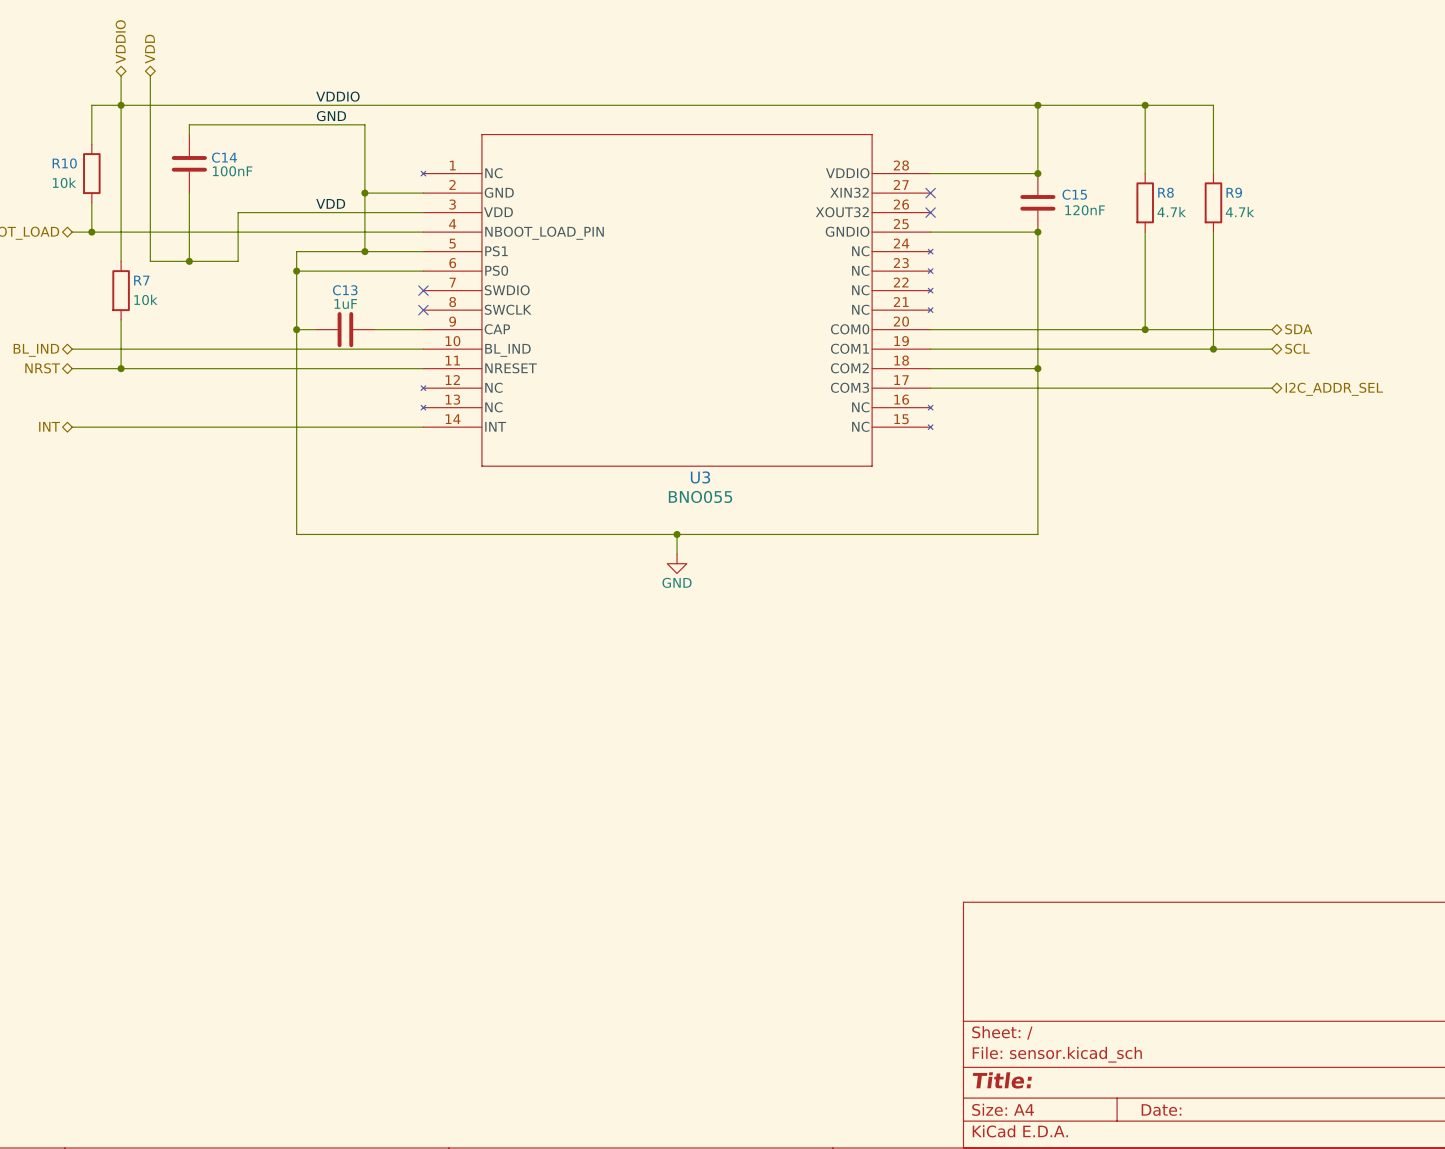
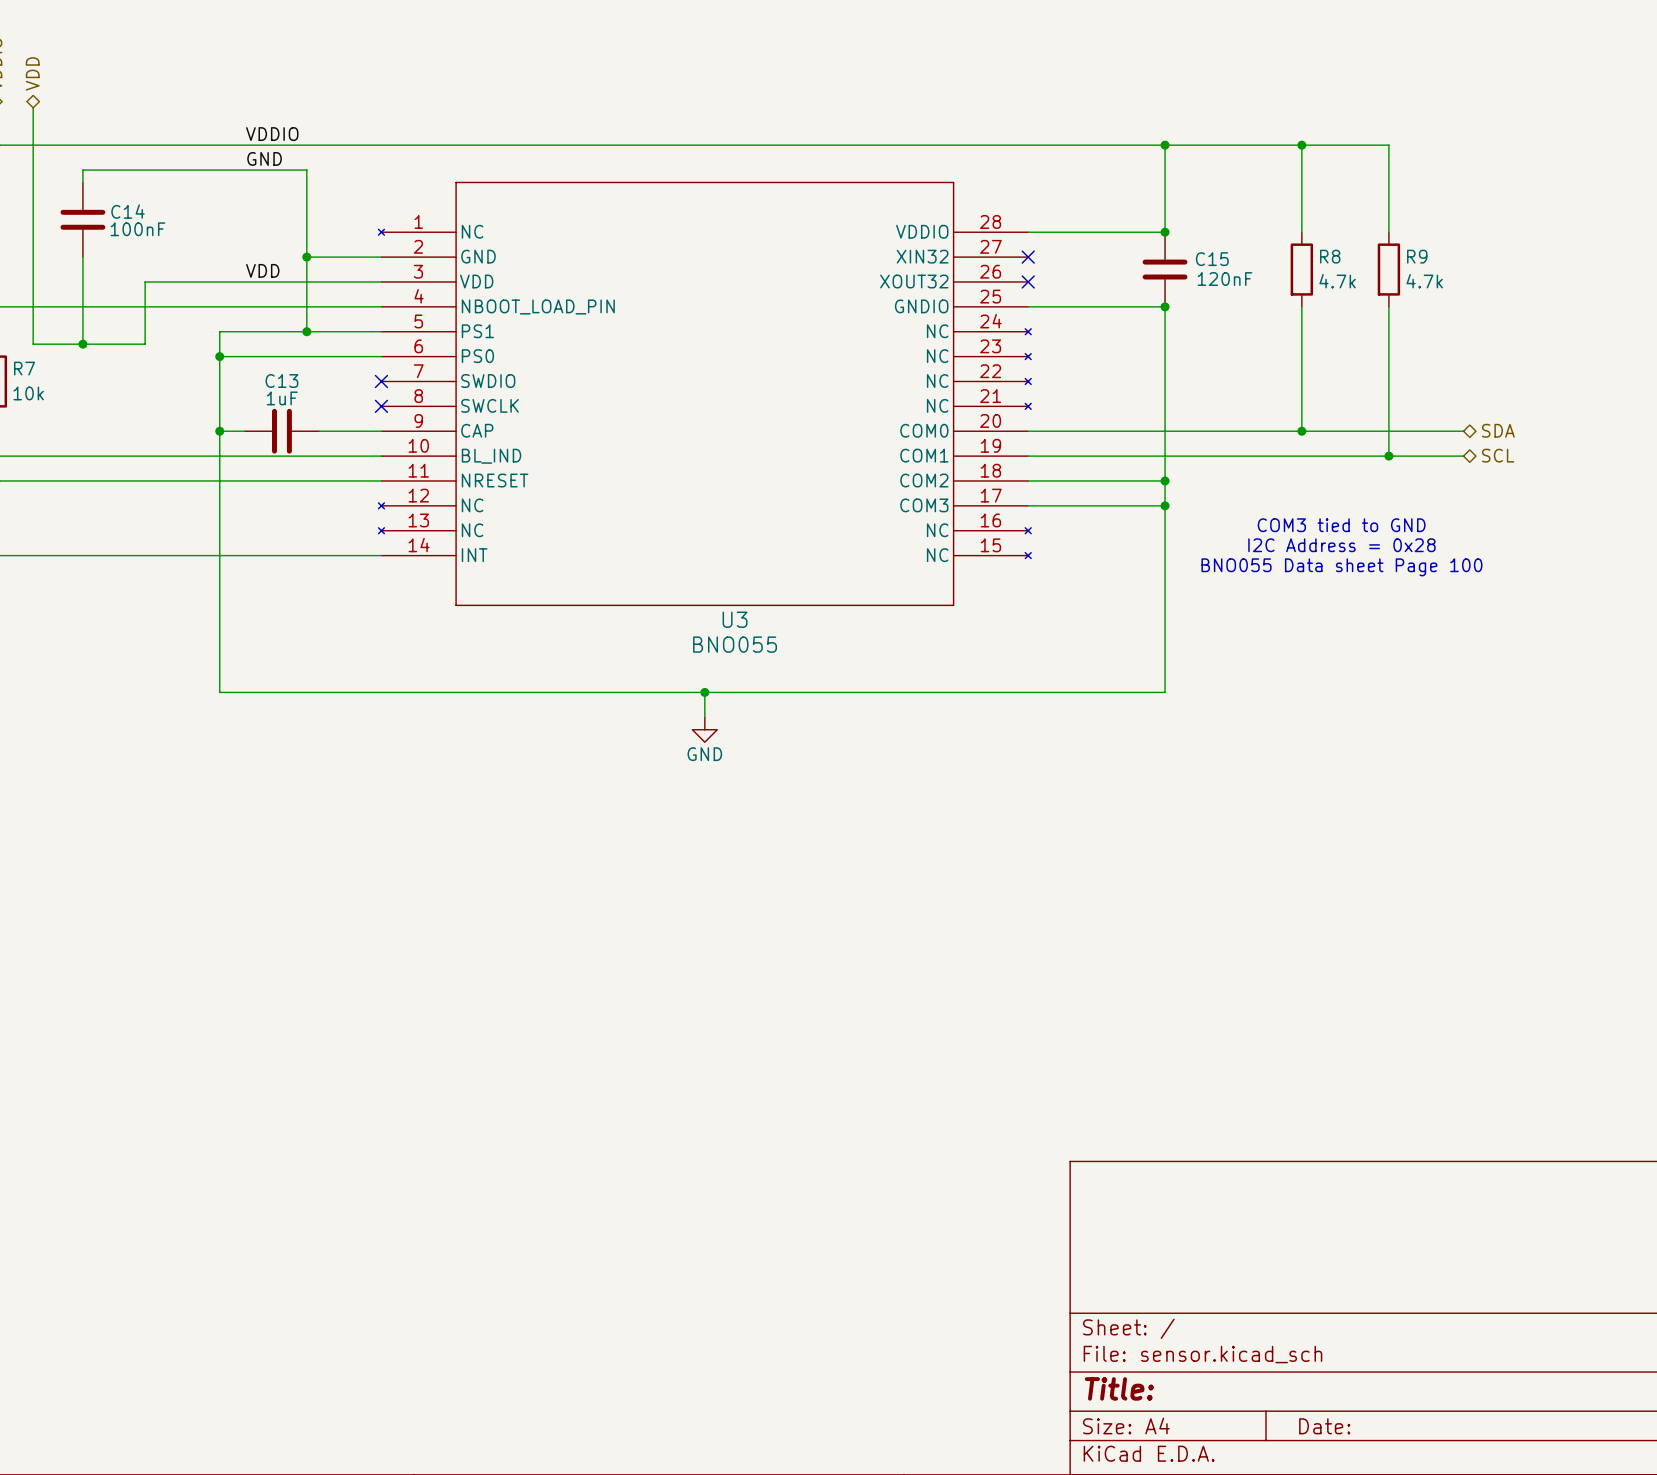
wire: (1037, 388) (1271, 388) -> none
junction: none -> (1165, 505)
hierarchical label: I2C_ADDR_SEL (1334, 389) -> none
text: none -> COM3 tied to GND (1341, 525)
text: none -> I2C Address = 0x28 (1341, 545)
text: none -> BNO055 Data sheet Page 100 (1341, 567)

